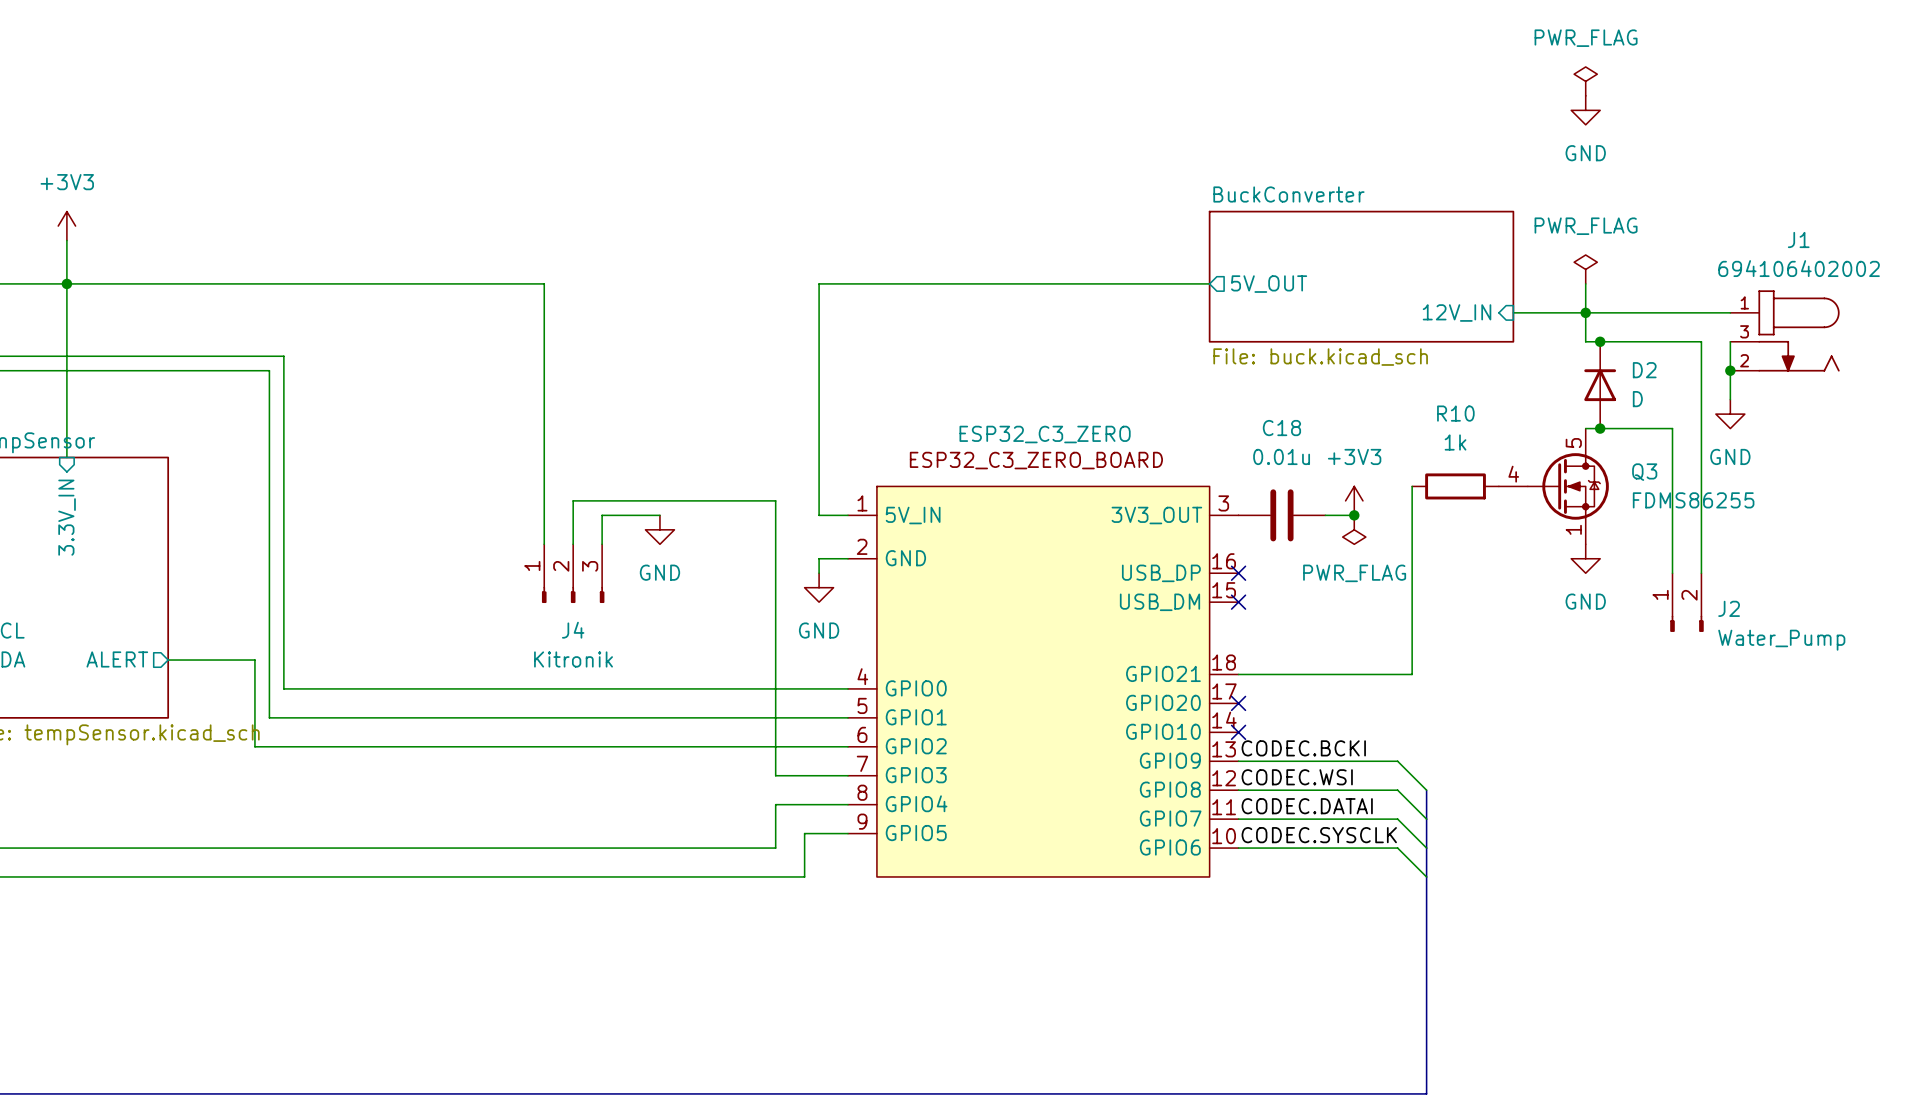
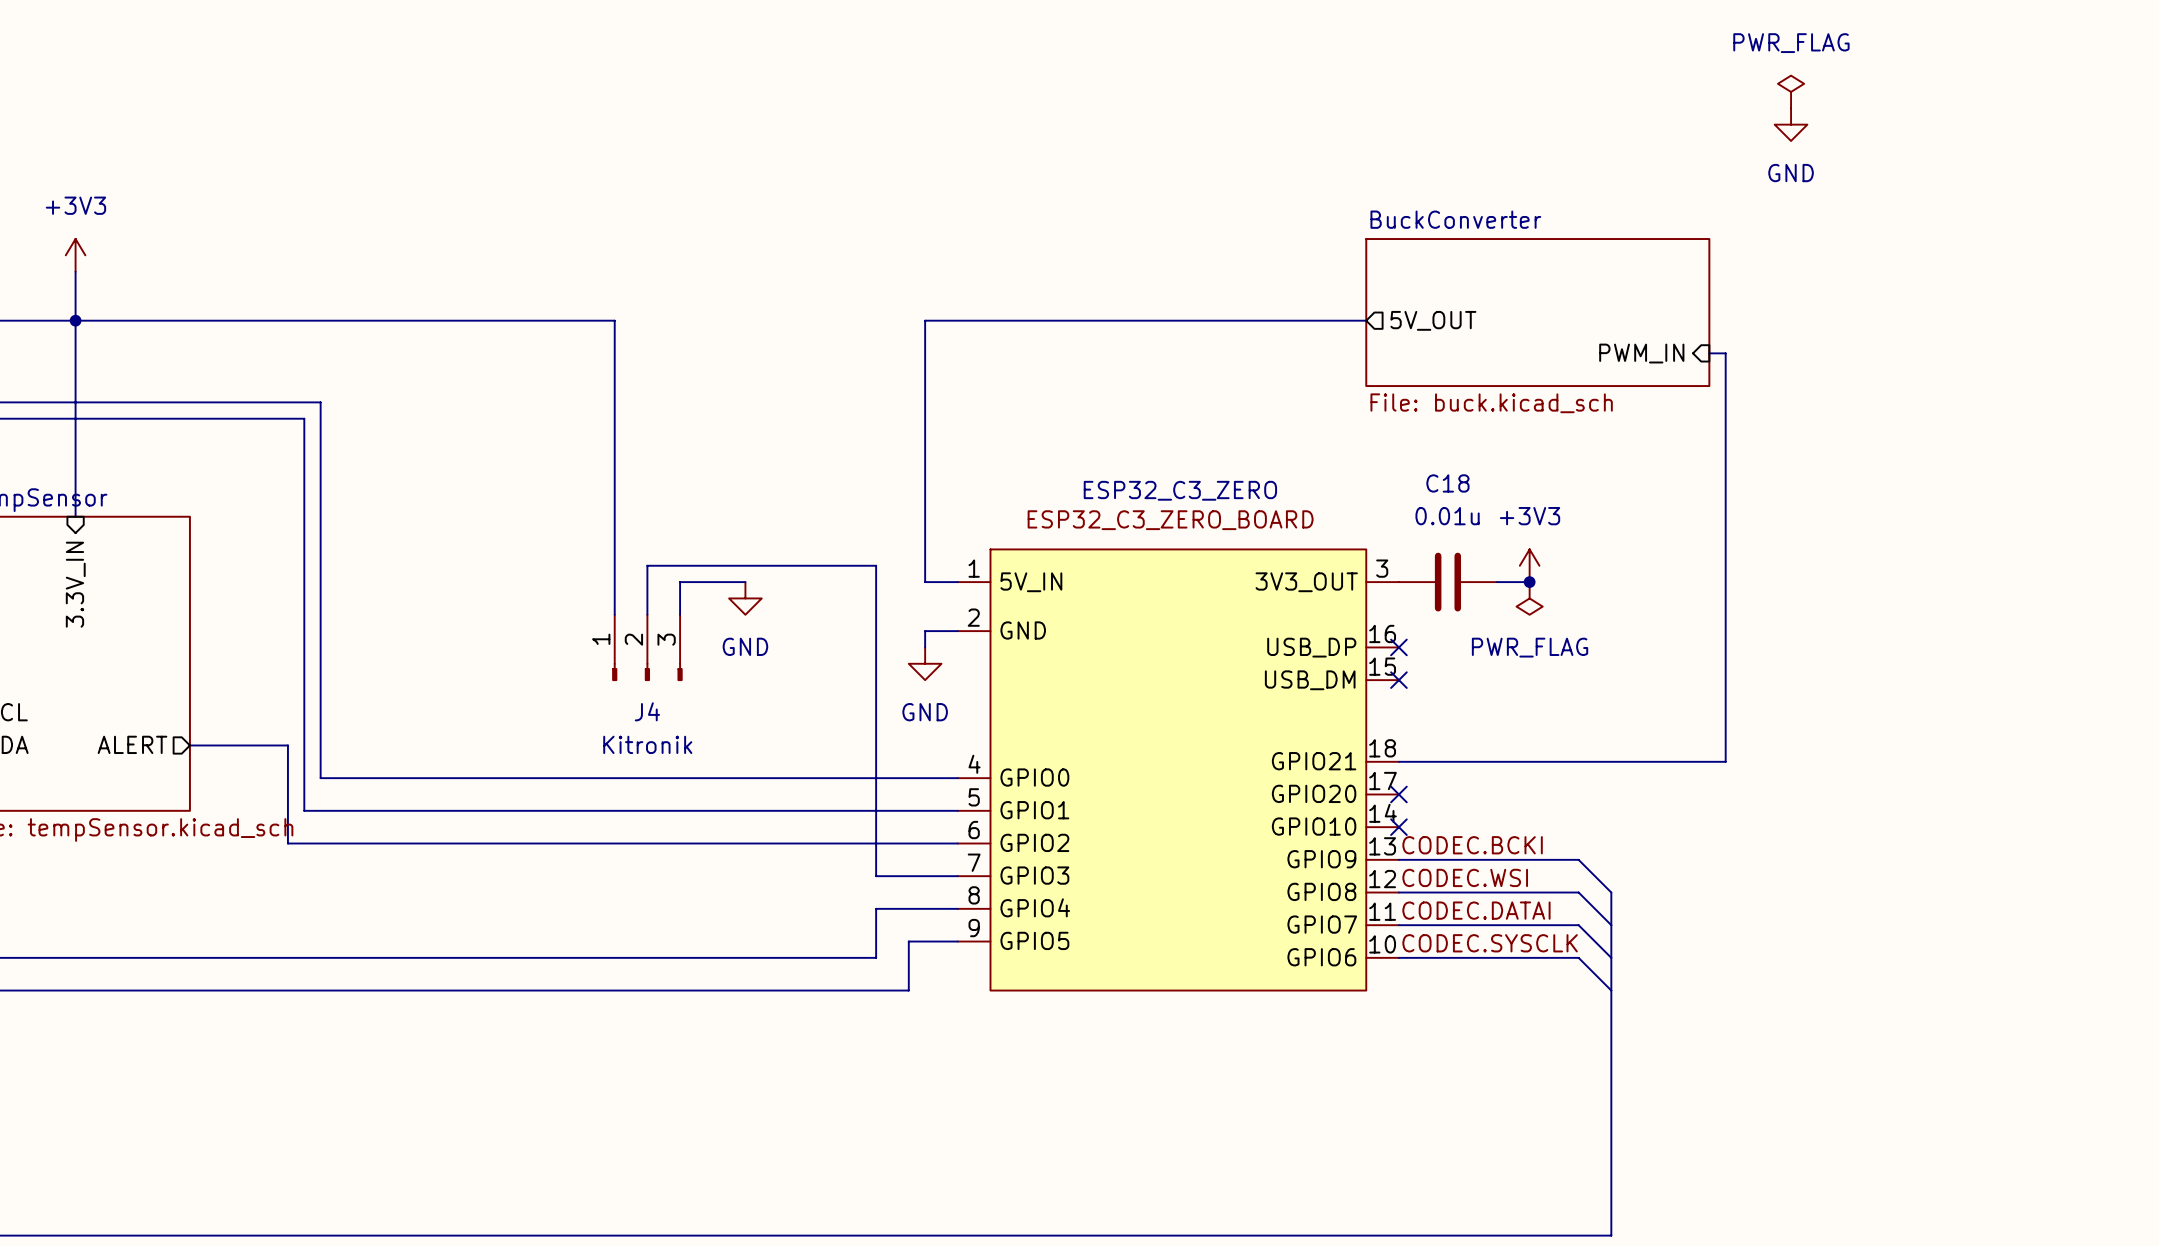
power symbol: PWR_FLAG (1585, 269) -> none
wire: (1585, 283) (1585, 341) (1701, 341) (1701, 573) -> none
wire: (1527, 312) (1730, 312) -> none
junction: (1585, 312) -> none
sheet pin: 12V_IN (1457, 313) -> PWM_IN (1641, 353)
J1: 694106402002 (1785, 330) -> none
junction: (1600, 341) -> none
wire: (1730, 341) (1730, 399) -> none
junction: (1730, 370) -> none
D2: D (1600, 385) -> none
power symbol: GND (1730, 414) -> none
wire: (1585, 428) (1672, 428) (1672, 573) -> none
junction: (1600, 428) -> none
wire: (1412, 486) (1412, 674) -> (1725, 353) (1725, 761) (1594, 761)
R10: 1k (1455, 486) -> none
Q3: FDMS86255 (1553, 486) -> none
power symbol: GND (1585, 558) -> none
J2: Water_Pump (1686, 602) -> none

